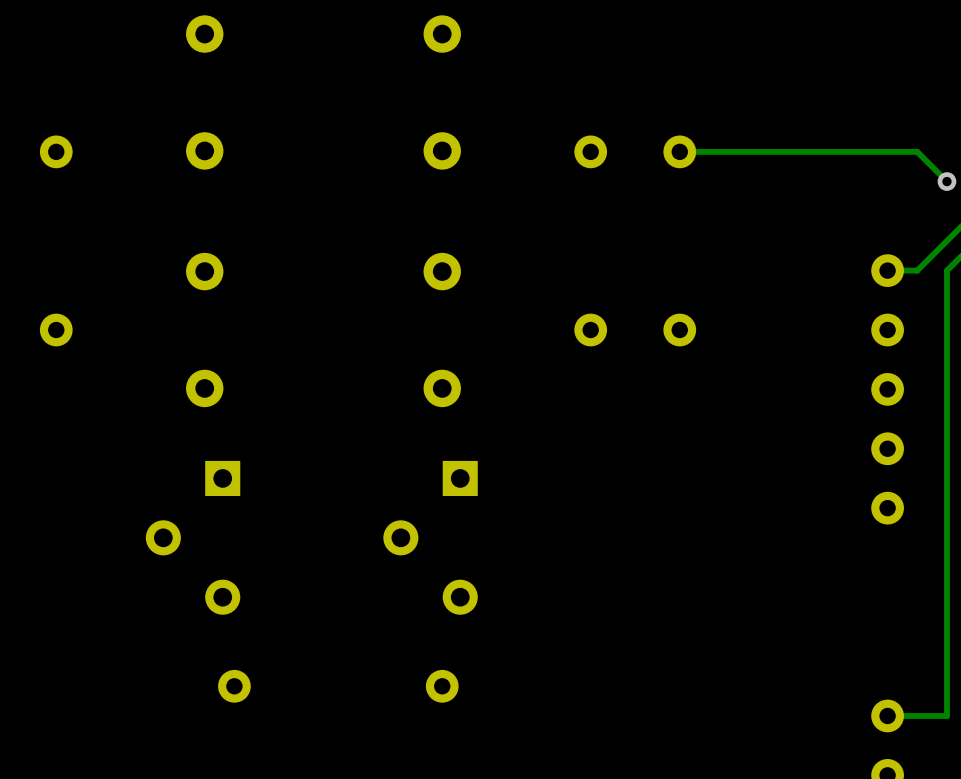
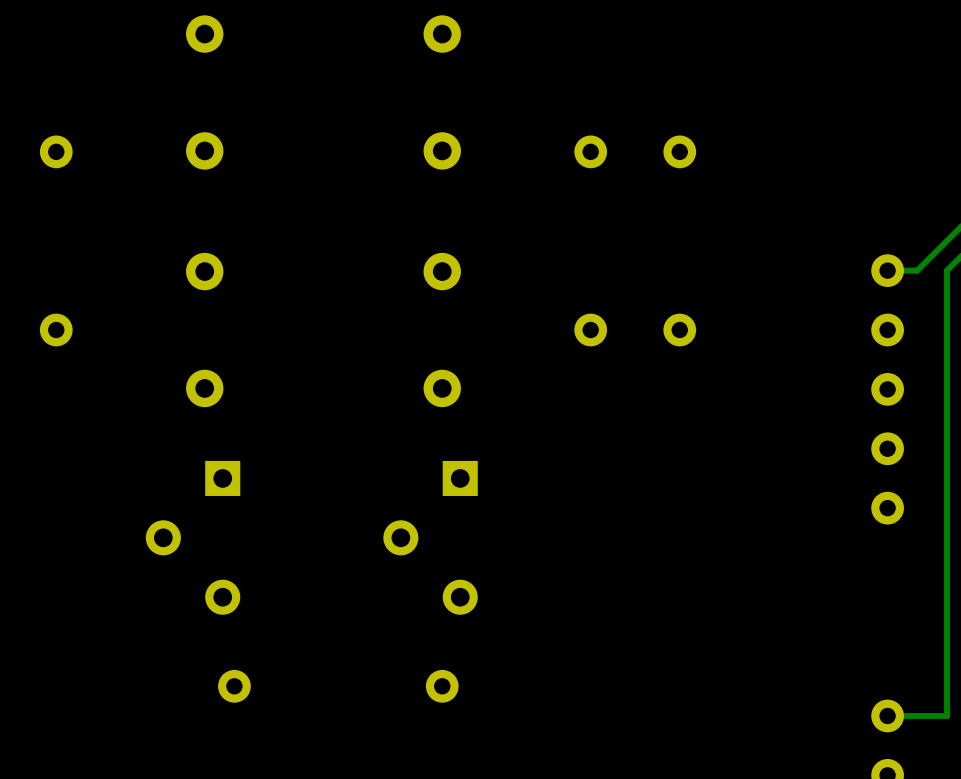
track: (679, 151) (917, 151) (946, 181) -> none
via: (946, 181) -> none

